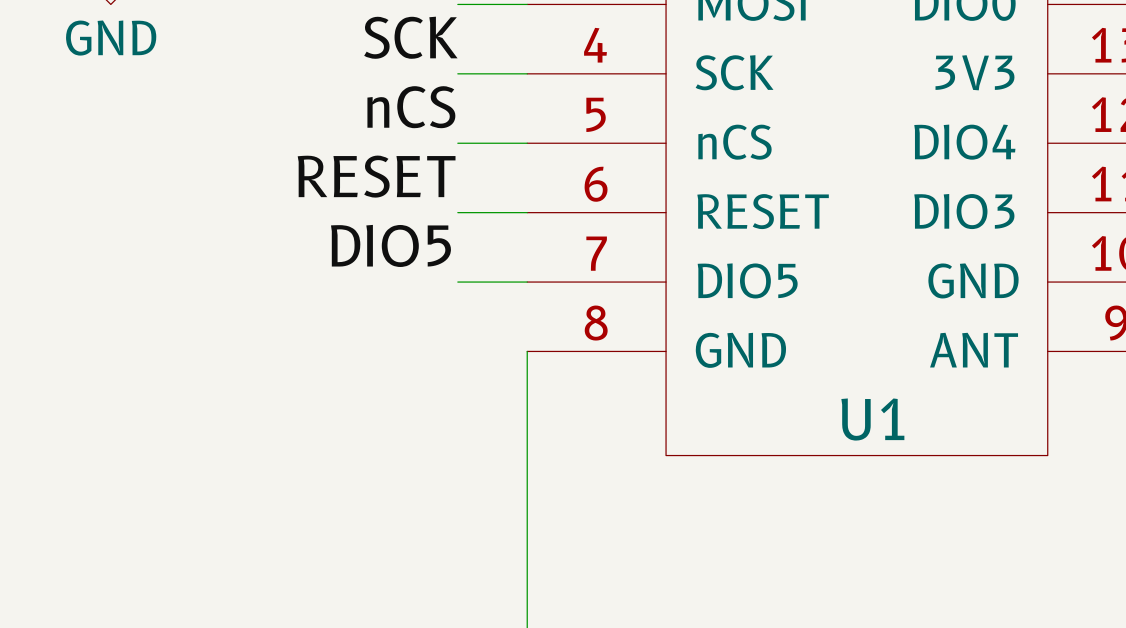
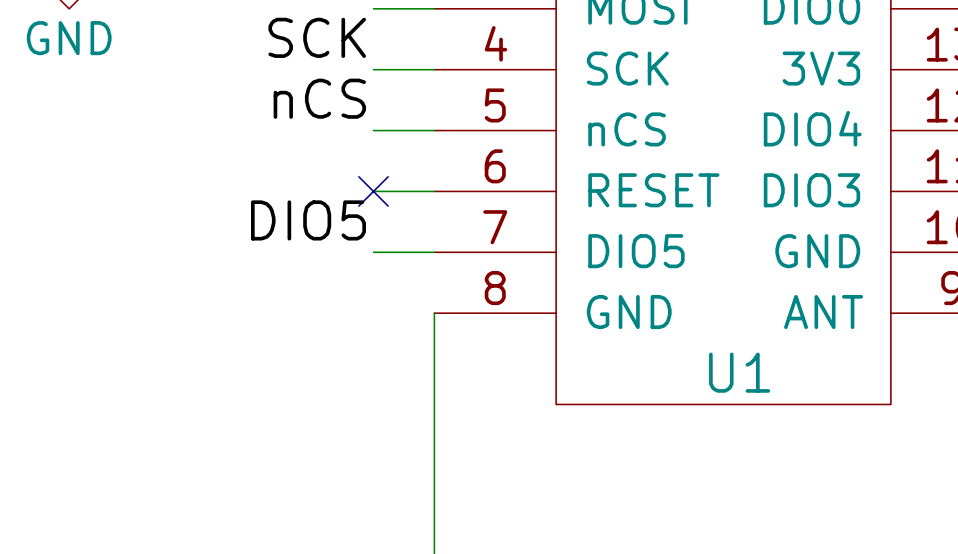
label: RESET (376, 176) -> none
no-connect mark: none -> (373, 191)

